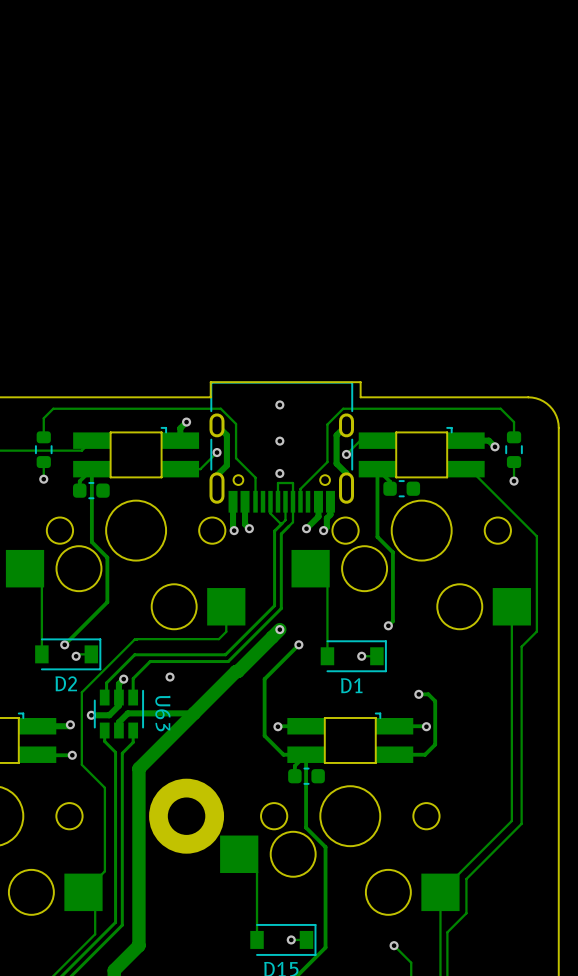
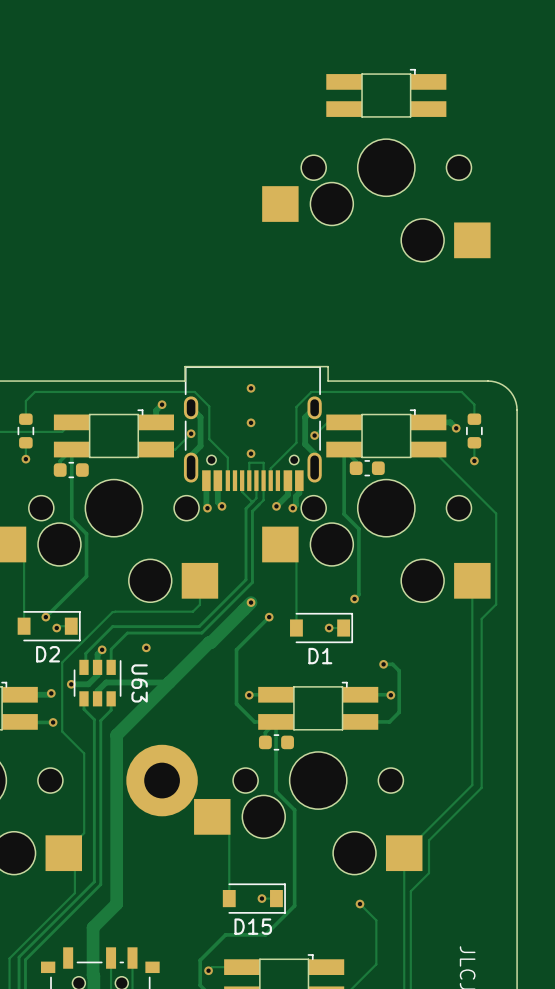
part: none -> (376, 165)

